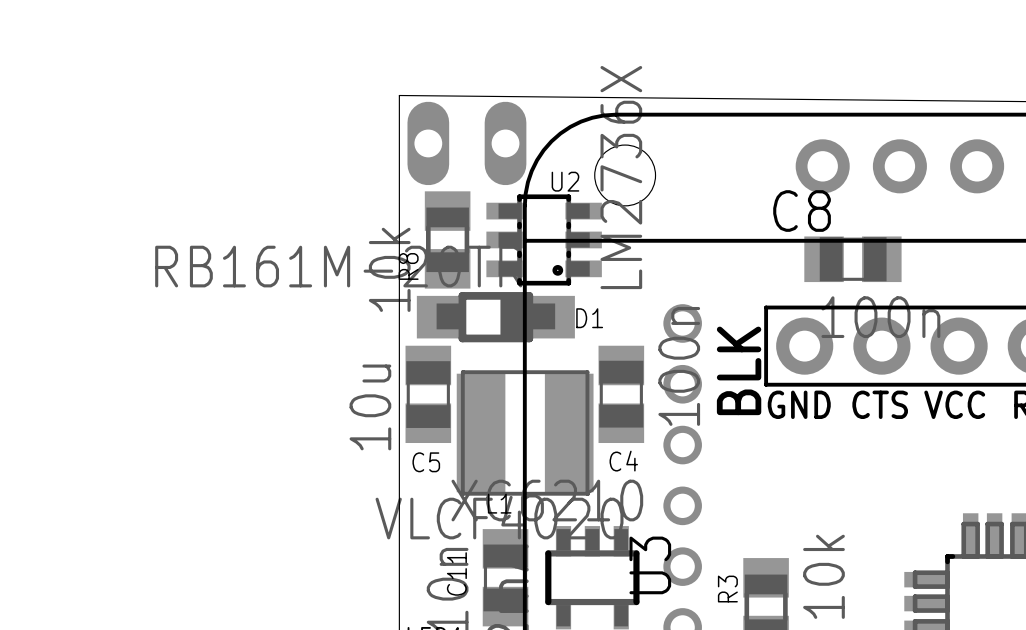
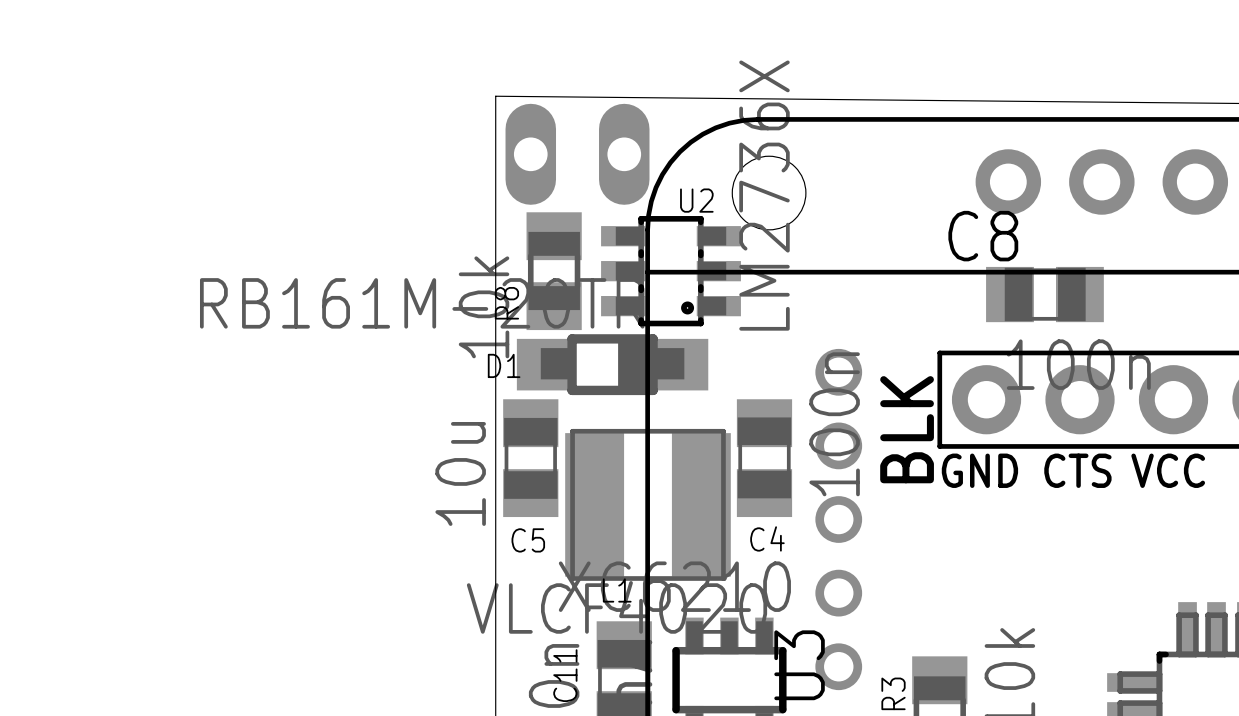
D1 name position: D1 (589, 318) -> D1 (504, 365)

